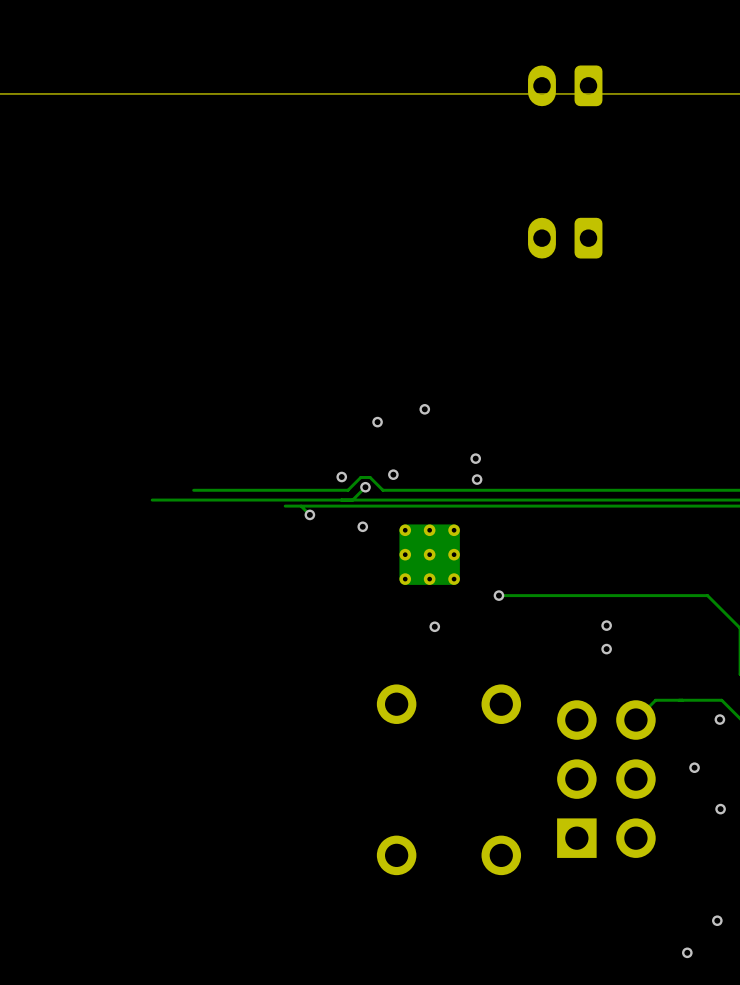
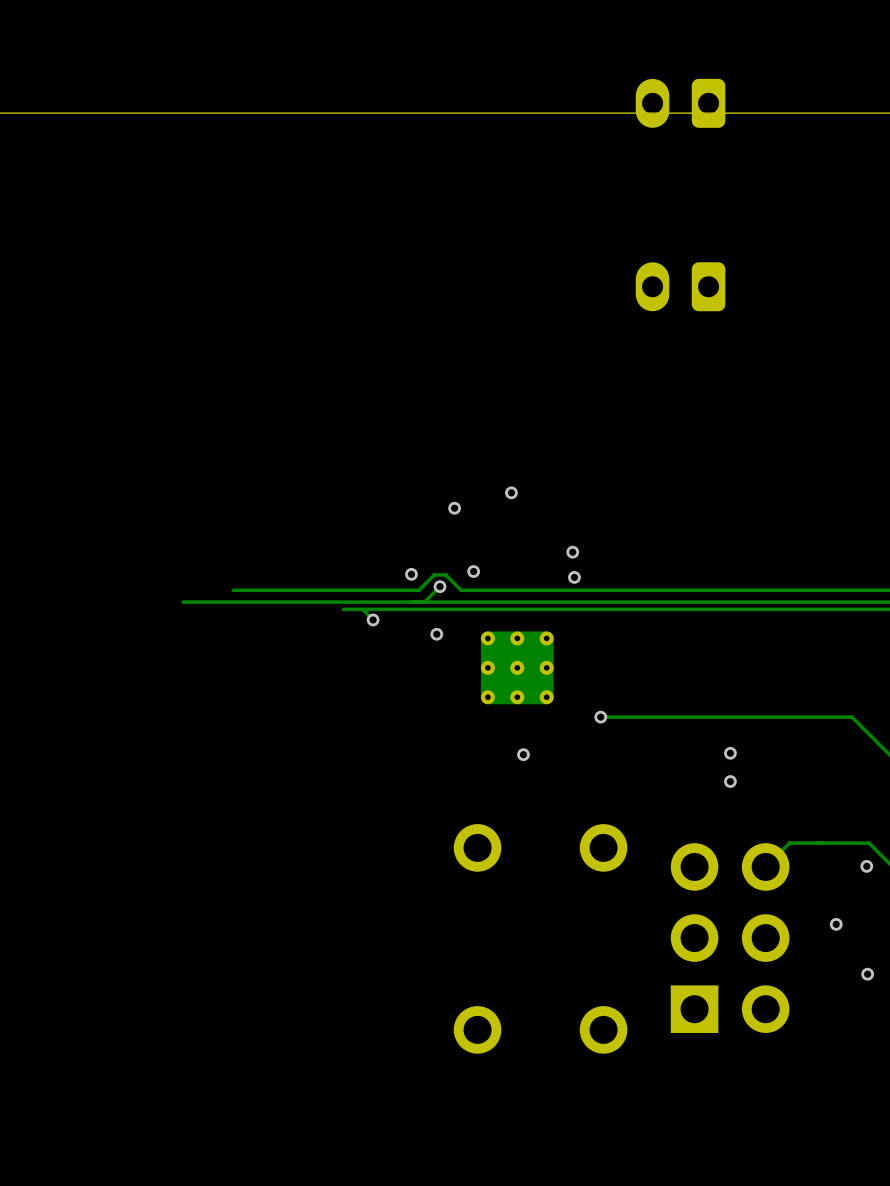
via: (717, 920) -> none
via: (687, 952) -> none

